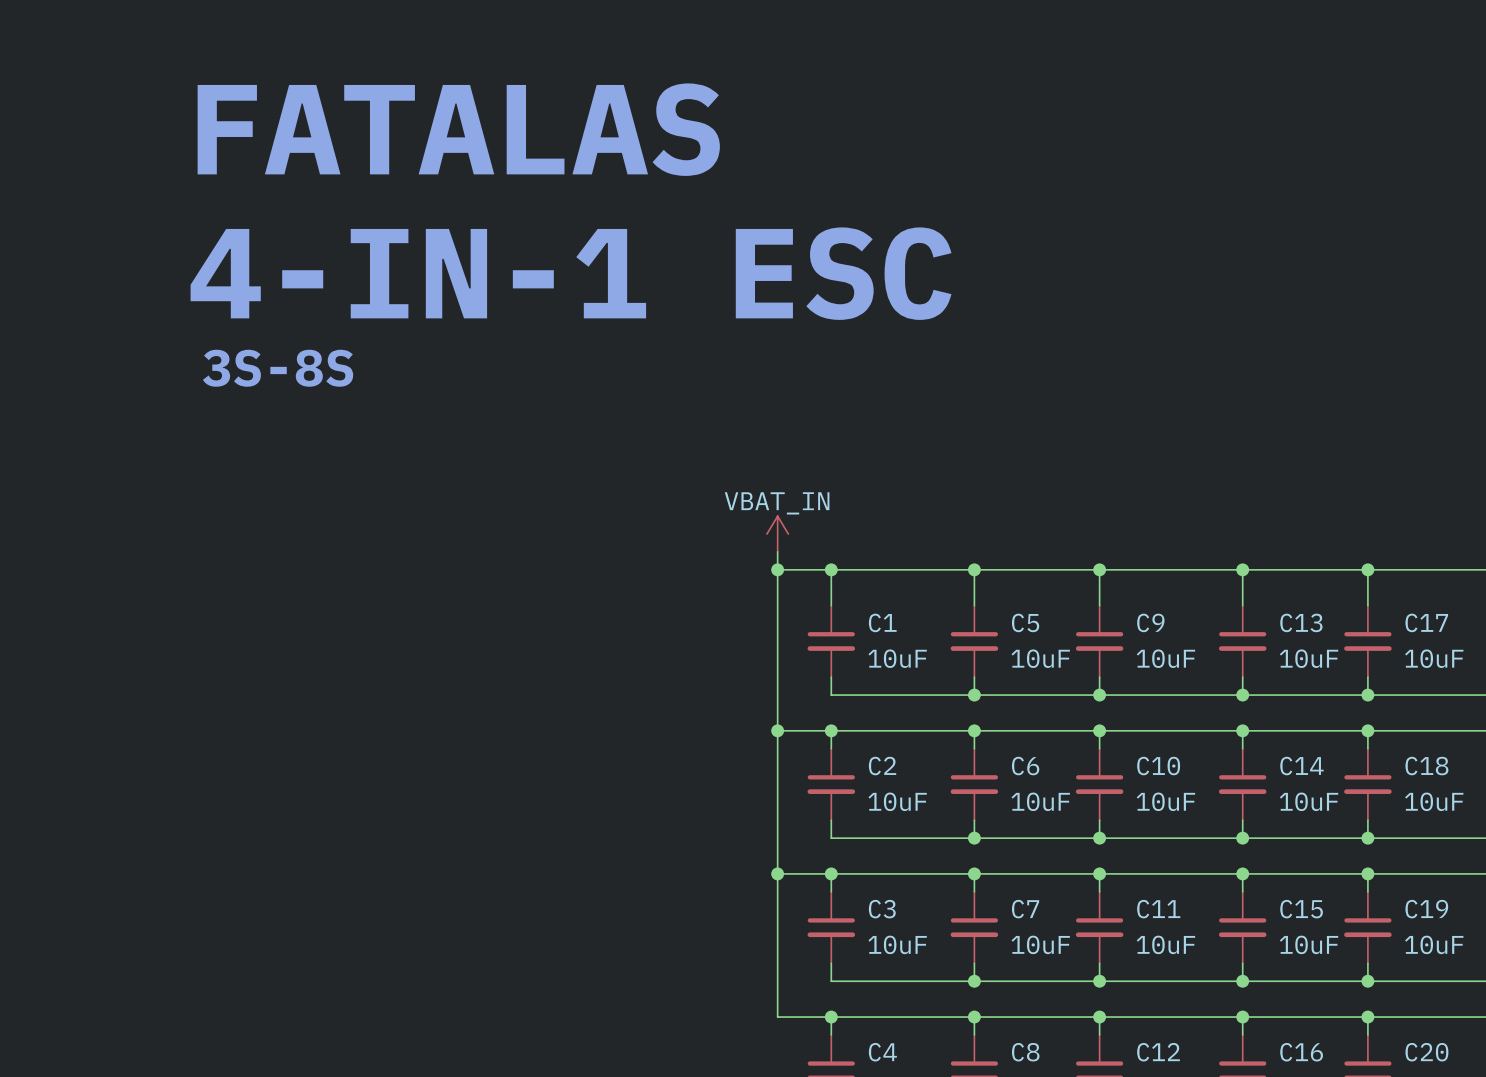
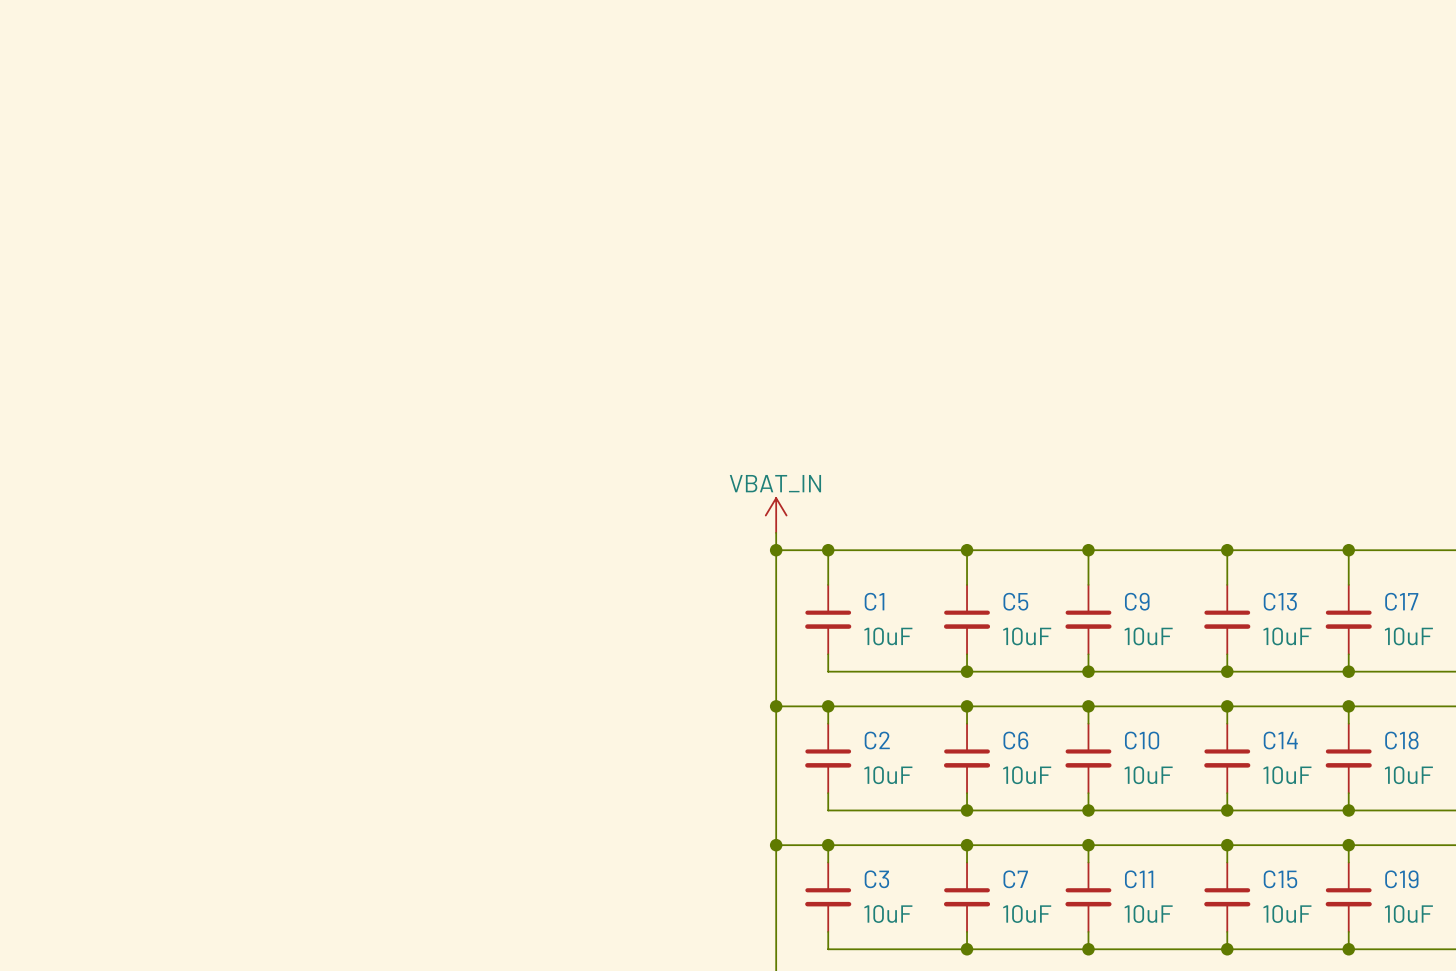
text: FATALAS (458, 129) -> none
text: 4-IN-1 ESC (571, 273) -> none
text: 3S-8S (278, 368) -> none

